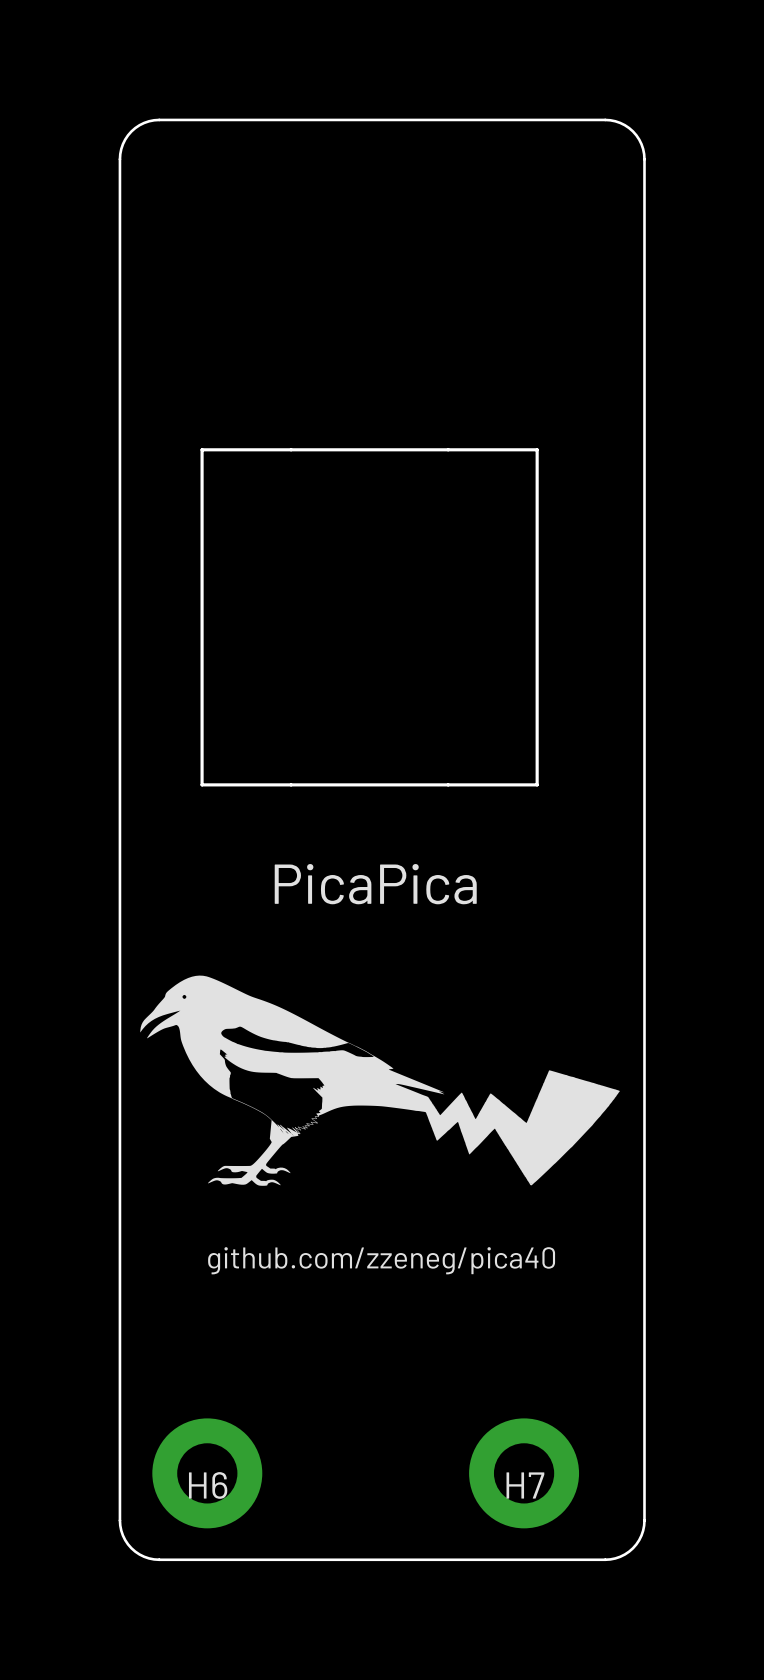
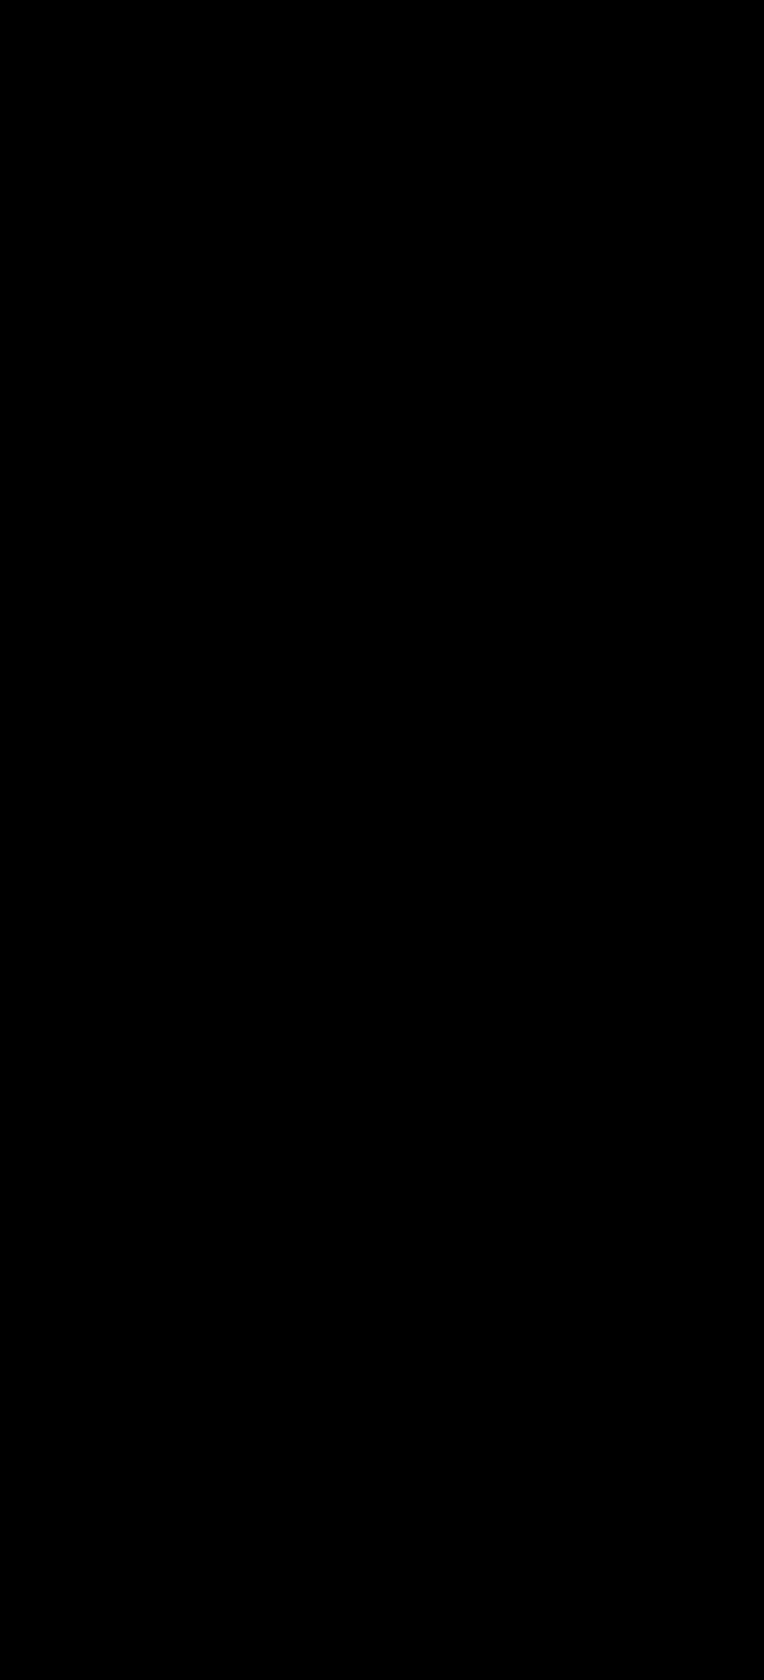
board edge: (159, 119) (605, 119) (615, 121) (629, 128) (636, 135) (643, 149) (644, 1520) (643, 1530) (636, 1544) (624, 1554) (615, 1558) (159, 1559) (144, 1556) (135, 1551) (125, 1540) (121, 1530) (119, 159) (122, 144) (131, 131) (144, 122) (159, 119) -> none
drawing: [200, 448, 539, 787] -> none
text: PicaPica (375, 884) -> none
drawing: [140, 975, 620, 1186] -> none
text: github.com/zzeneg/pica40 (381, 1260) -> none
H6: (207, 1473) -> none
H7: (524, 1473) -> none

